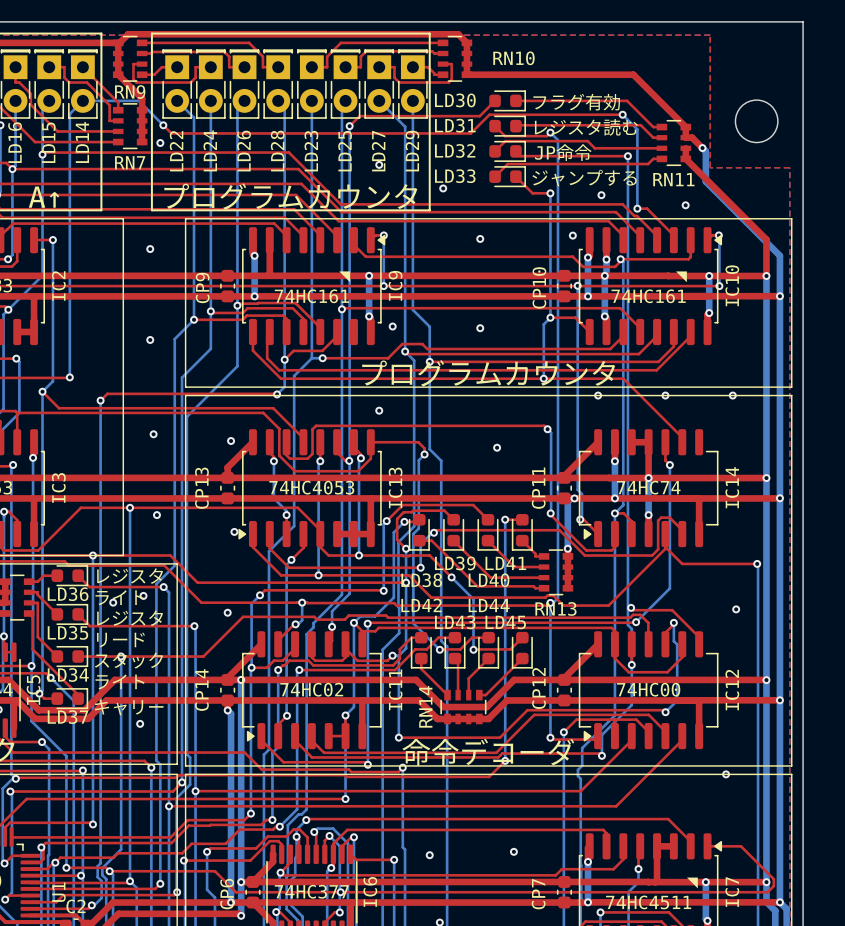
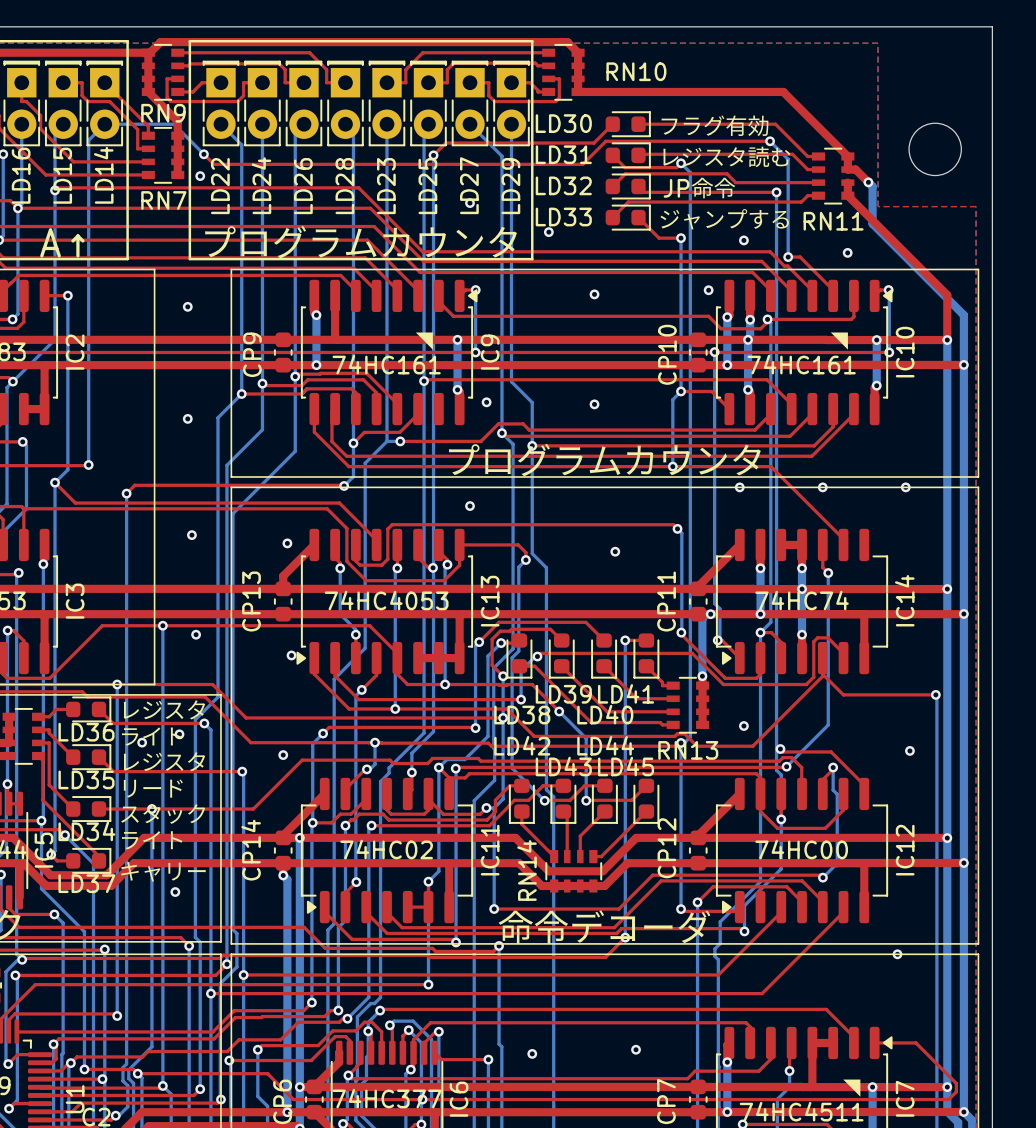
top track: (648, 461) (648, 478) -> none
bottom track: none -> (802, 568) (802, 589)
via: none -> (802, 568)
via: none -> (743, 726)

